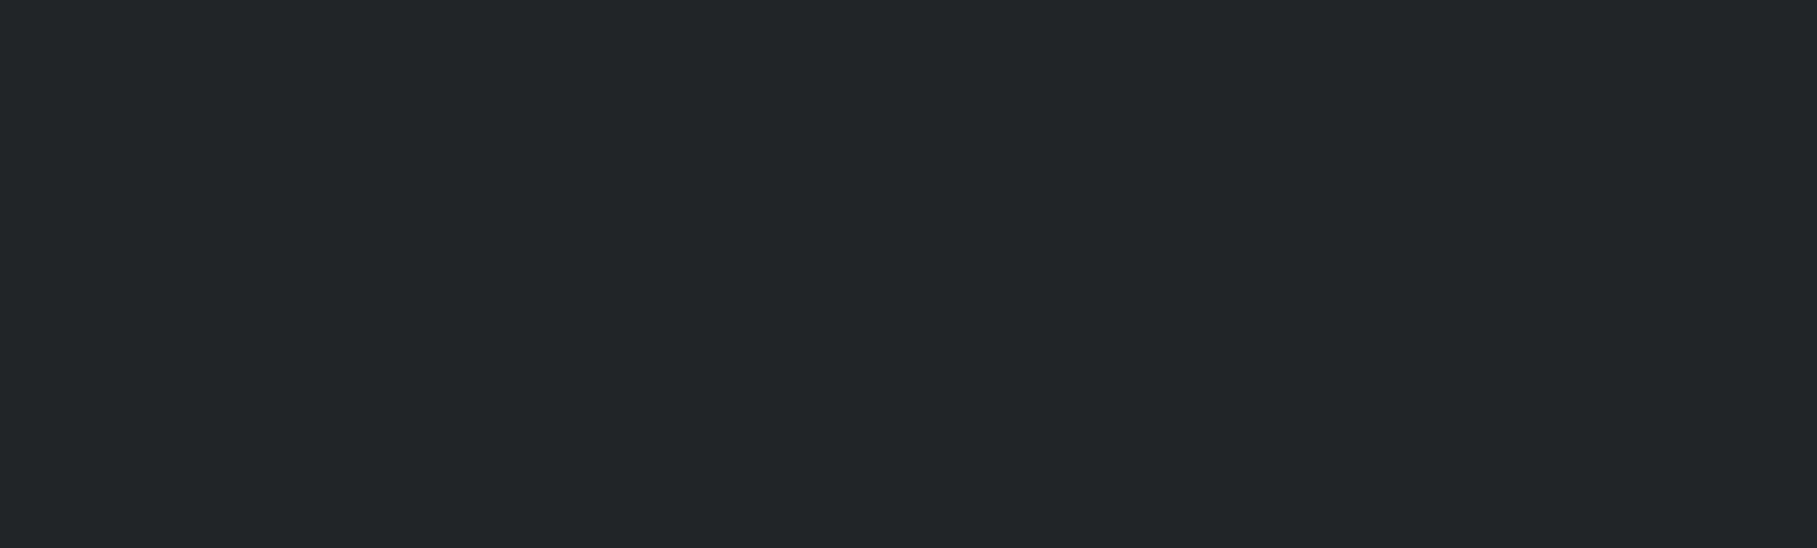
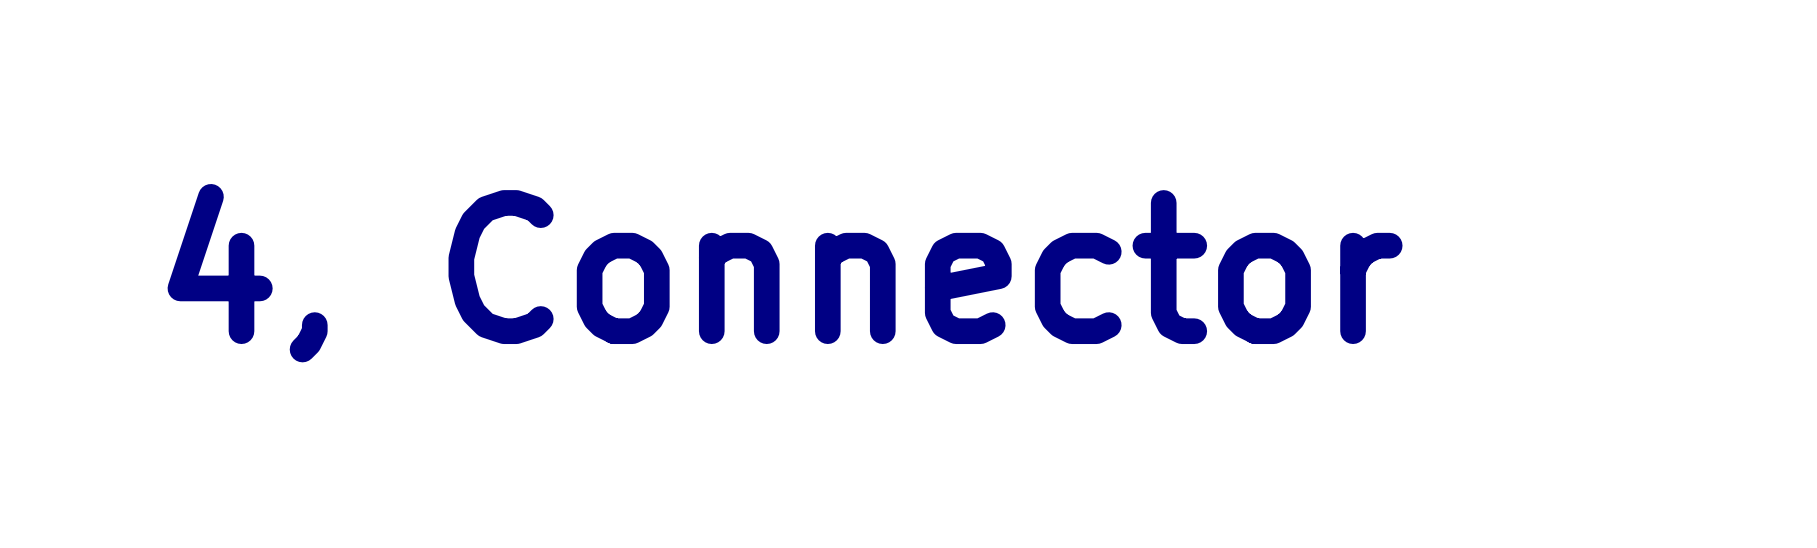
text: none -> 4, Connector (785, 273)

